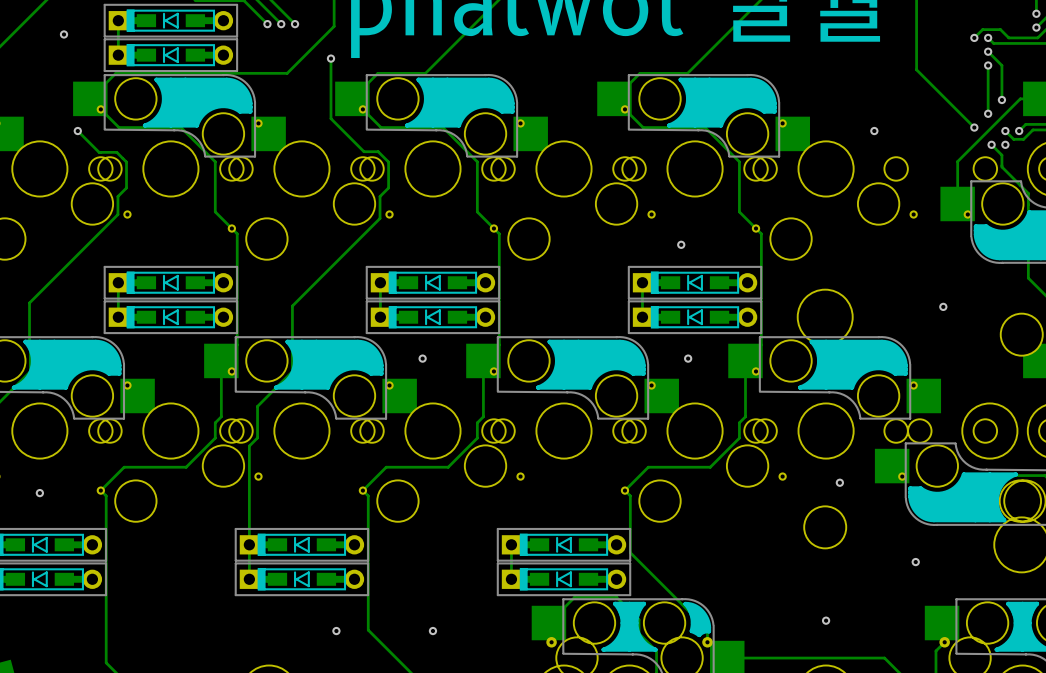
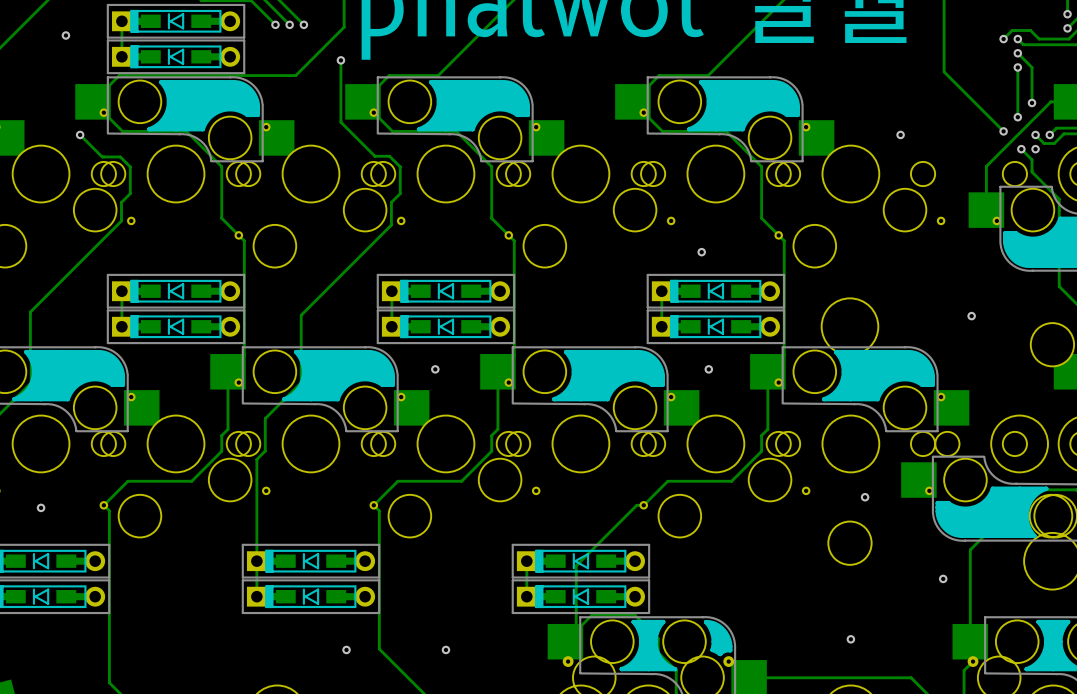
track: (624, 490) (630, 495) (630, 552) (707, 629) (707, 642) -> (643, 505) (636, 505) (576, 565) (576, 652)
track: none -> (1014, 505) (970, 549) (970, 641)

